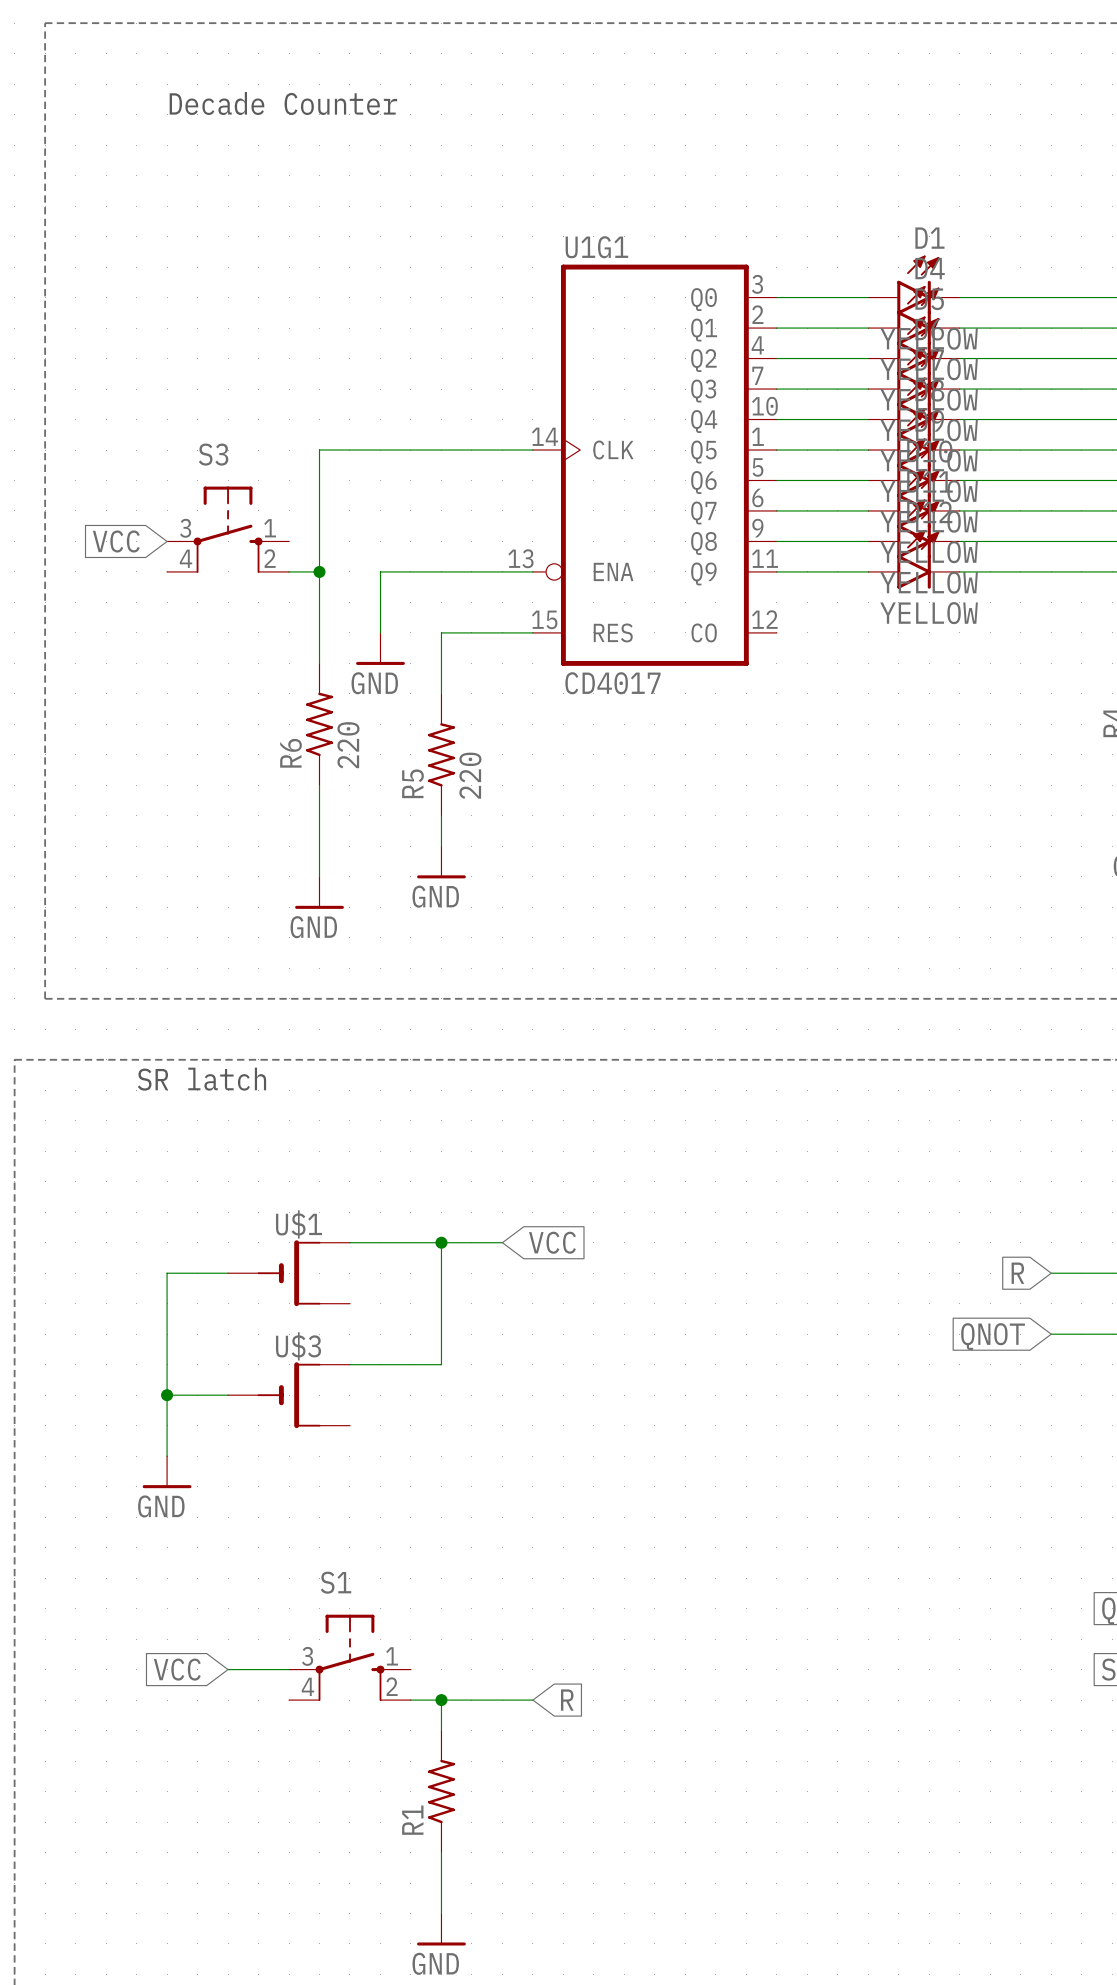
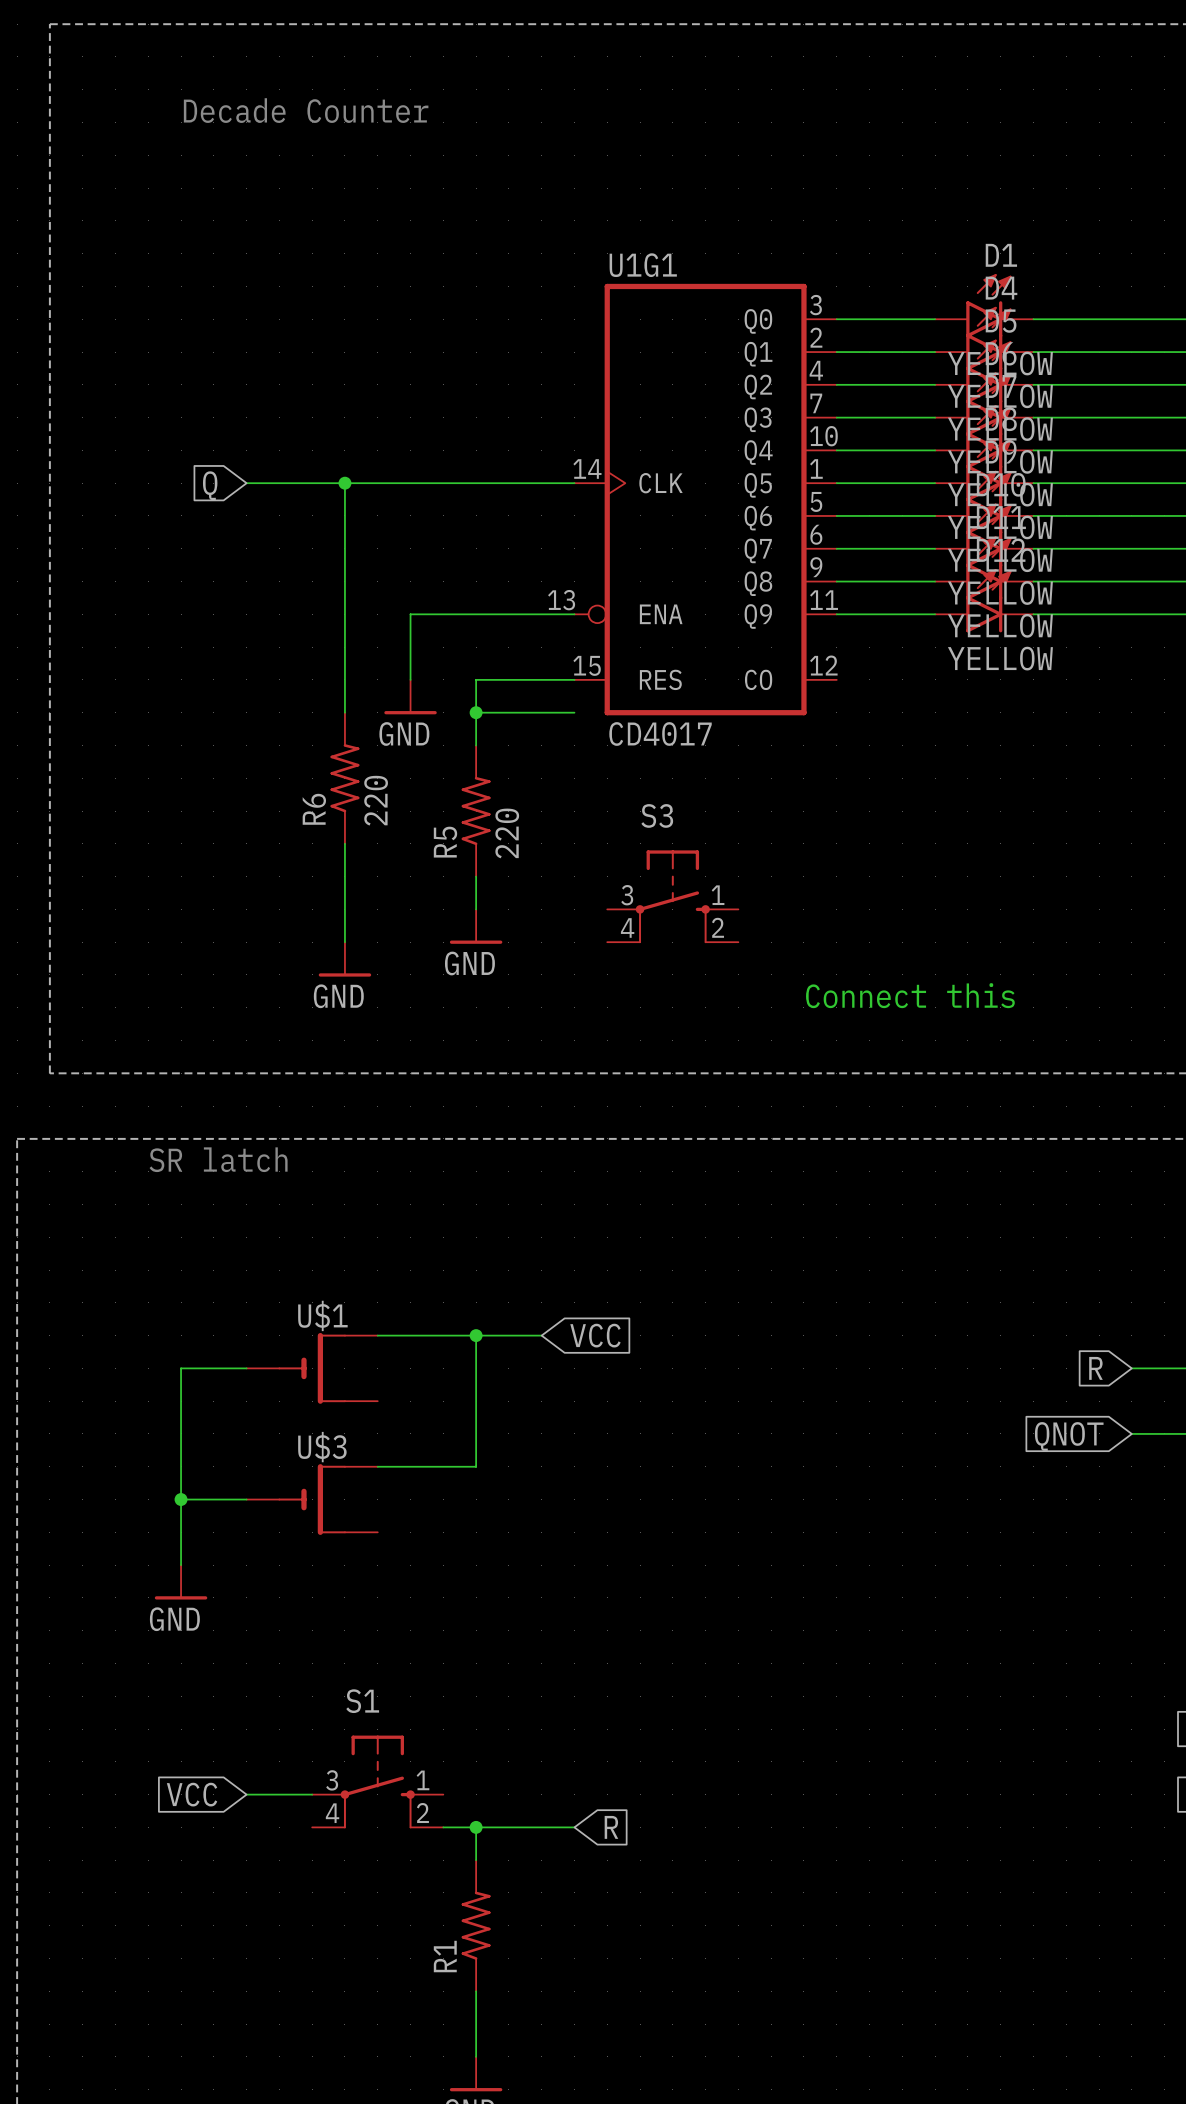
wire: none -> (246, 483) (344, 483)
junction: none -> (344, 483)
global label: none -> Q (210, 485)
S3 position: (228, 529) -> (672, 896)
global label: VCC (116, 541) -> none
wire: (289, 571) (319, 571) -> none
junction: (319, 571) -> none
wire: none -> (476, 712) (574, 712)
junction: none -> (476, 712)
text: none -> Connect this (910, 995)

